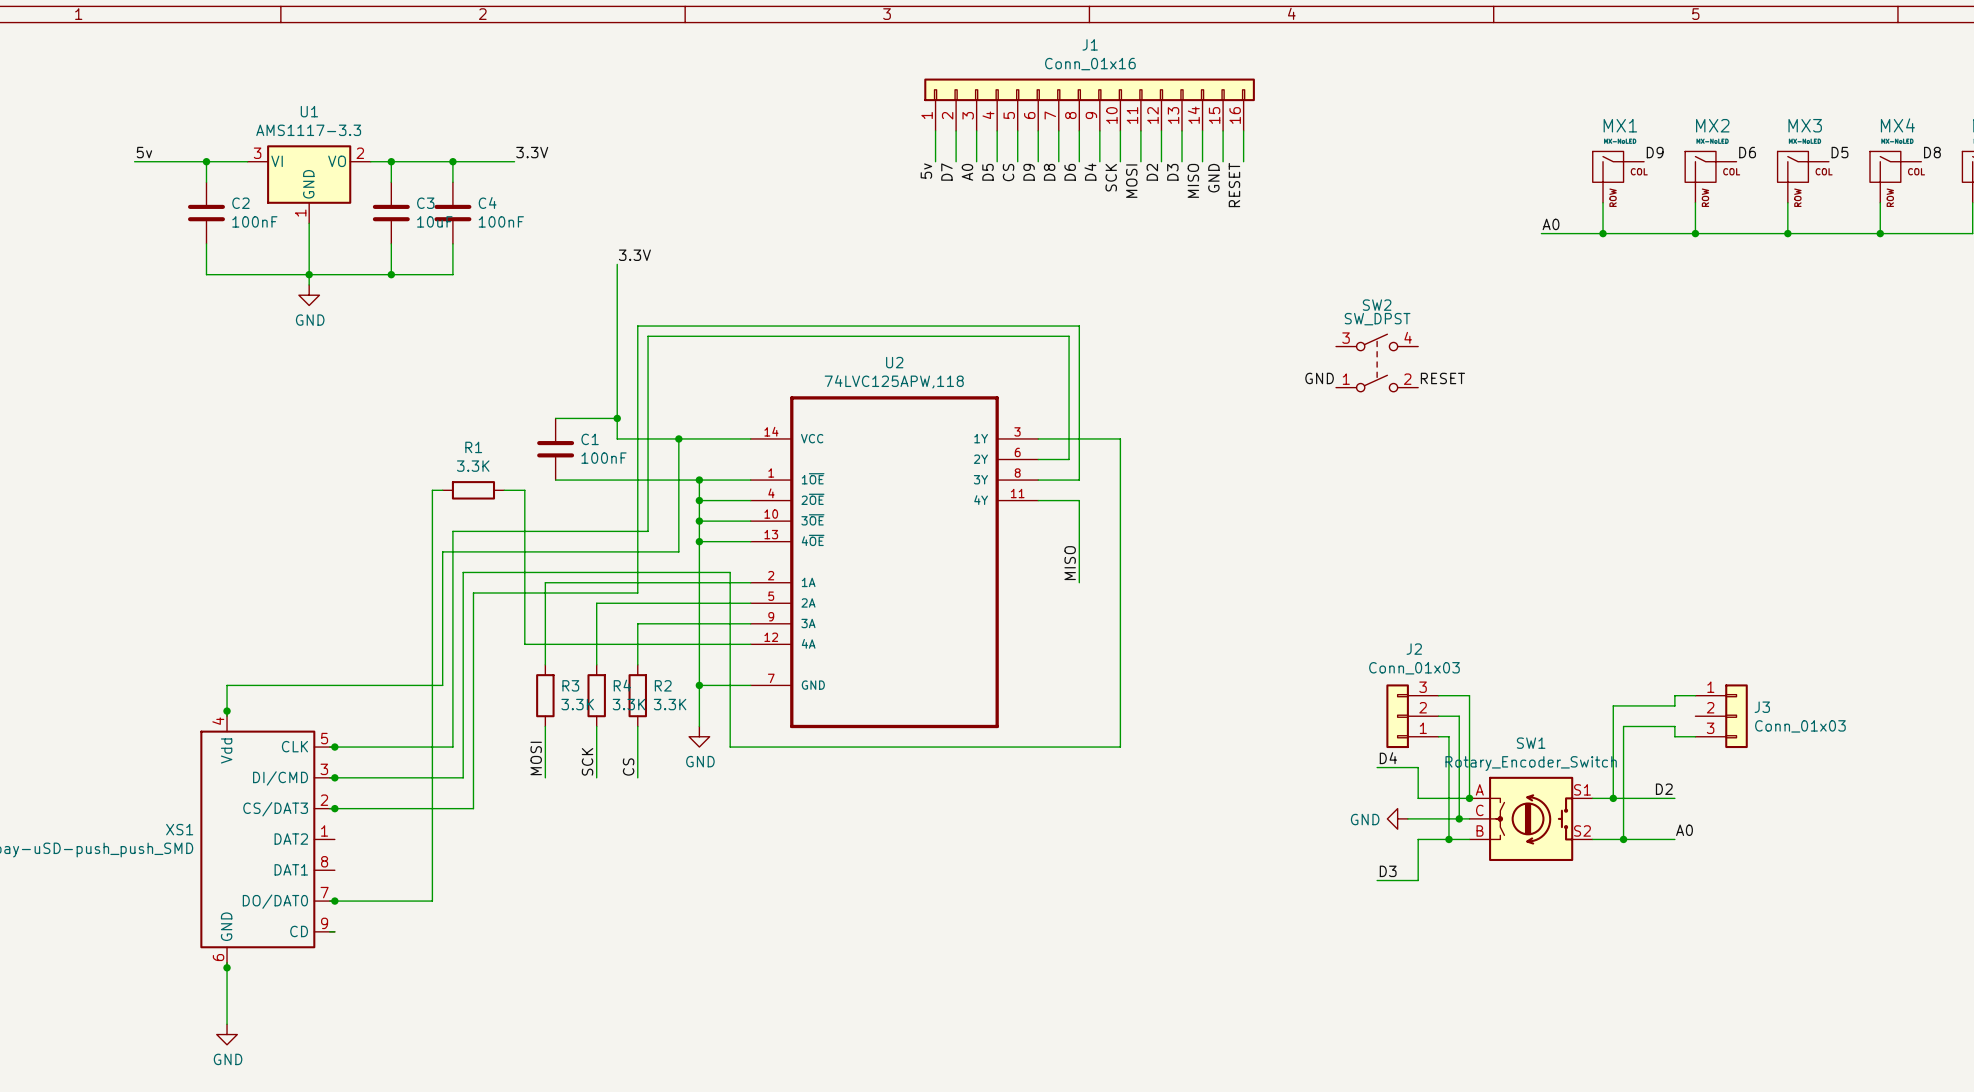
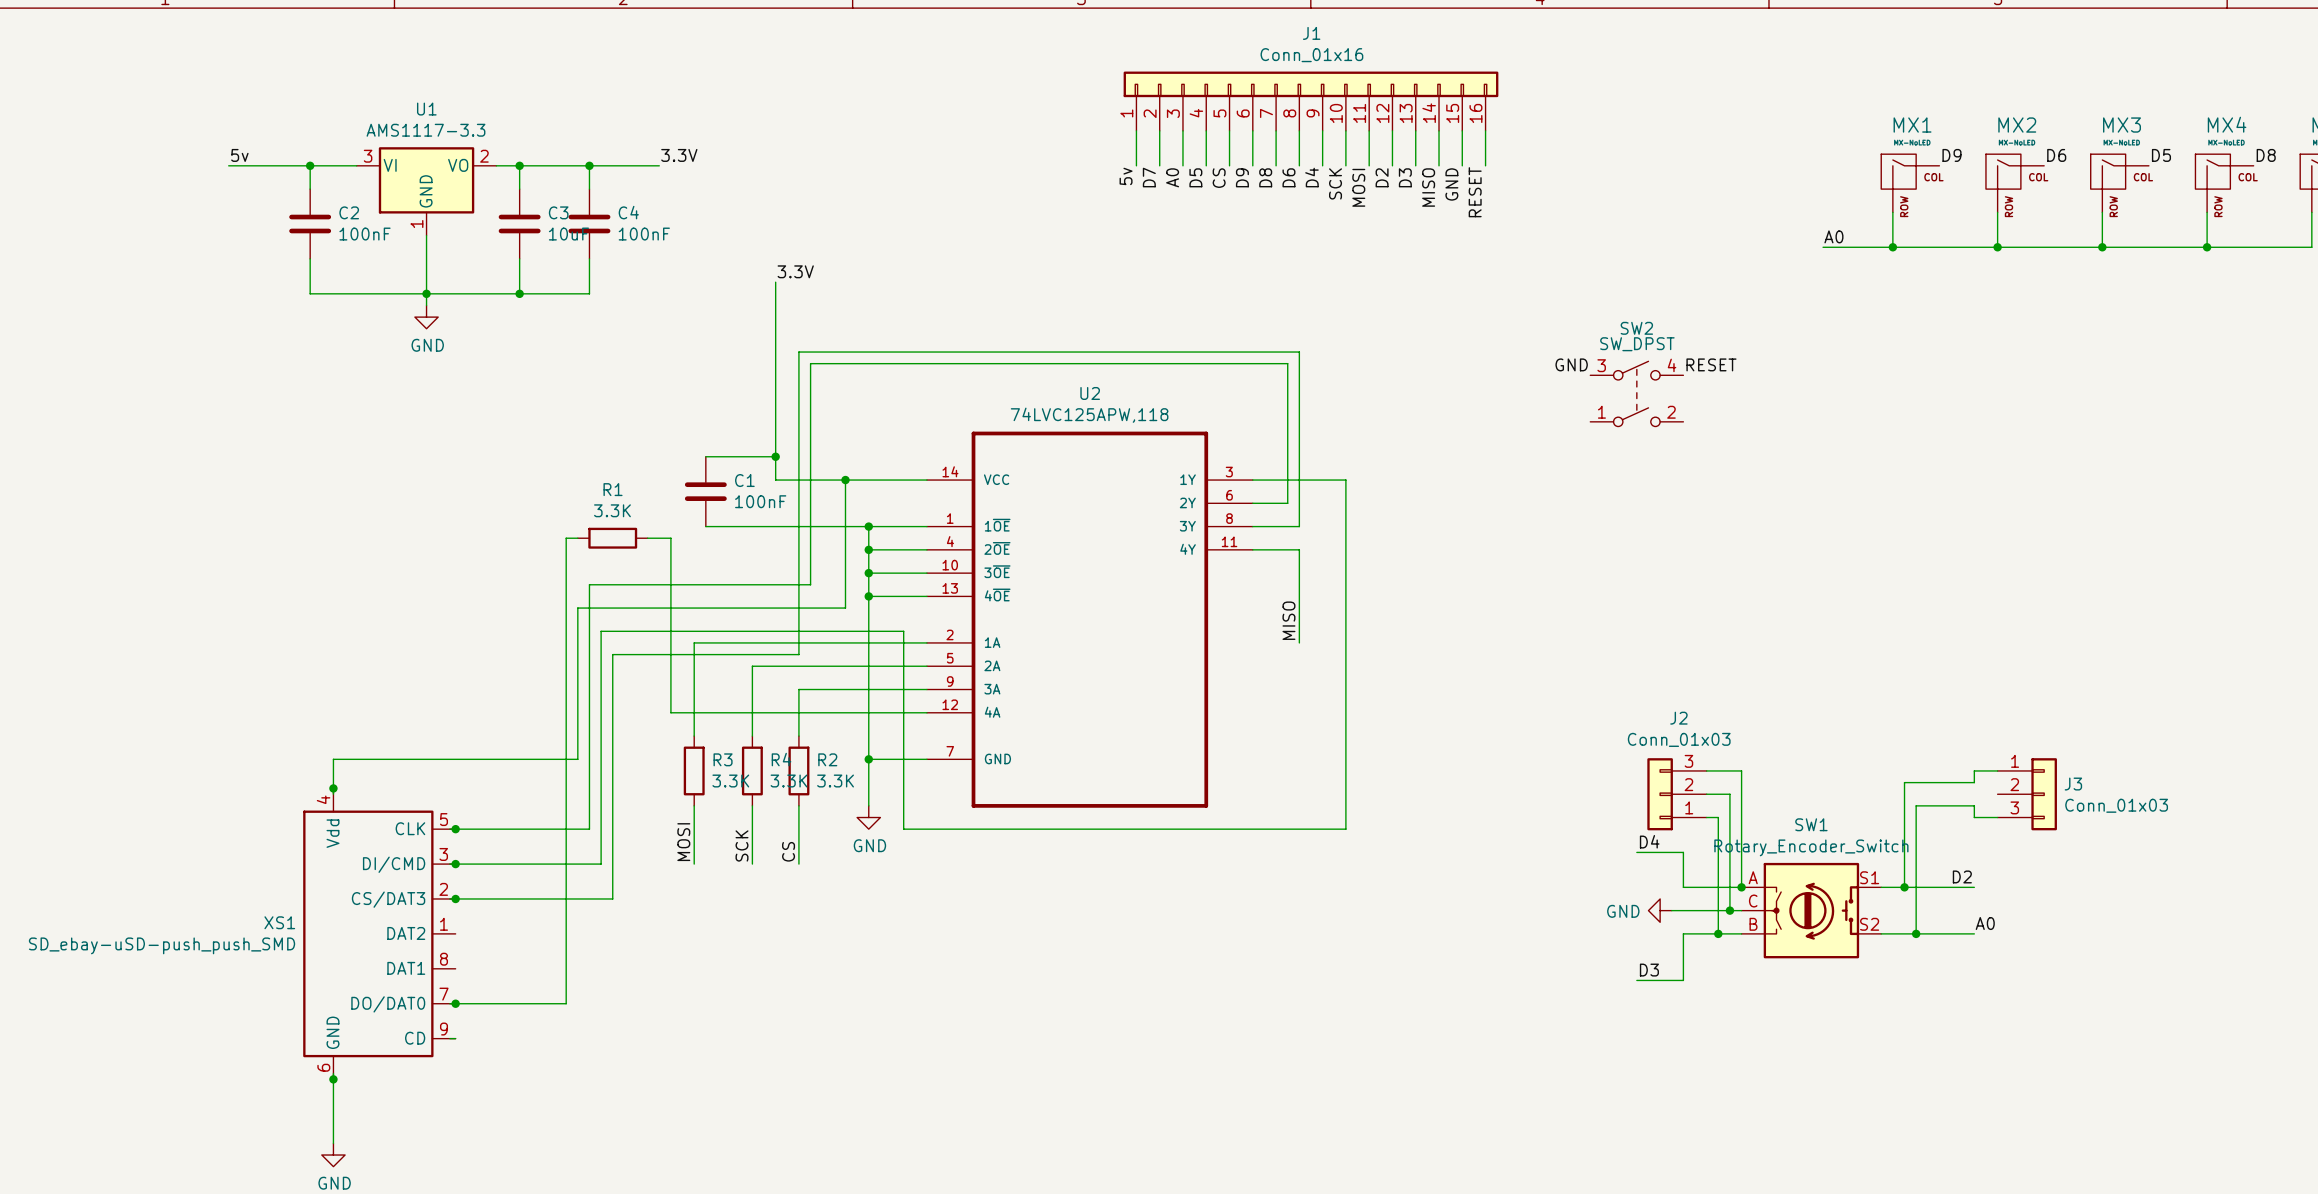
label position: GND (1319, 378) -> GND (1571, 364)
label position: RESET (1442, 378) -> RESET (1711, 364)

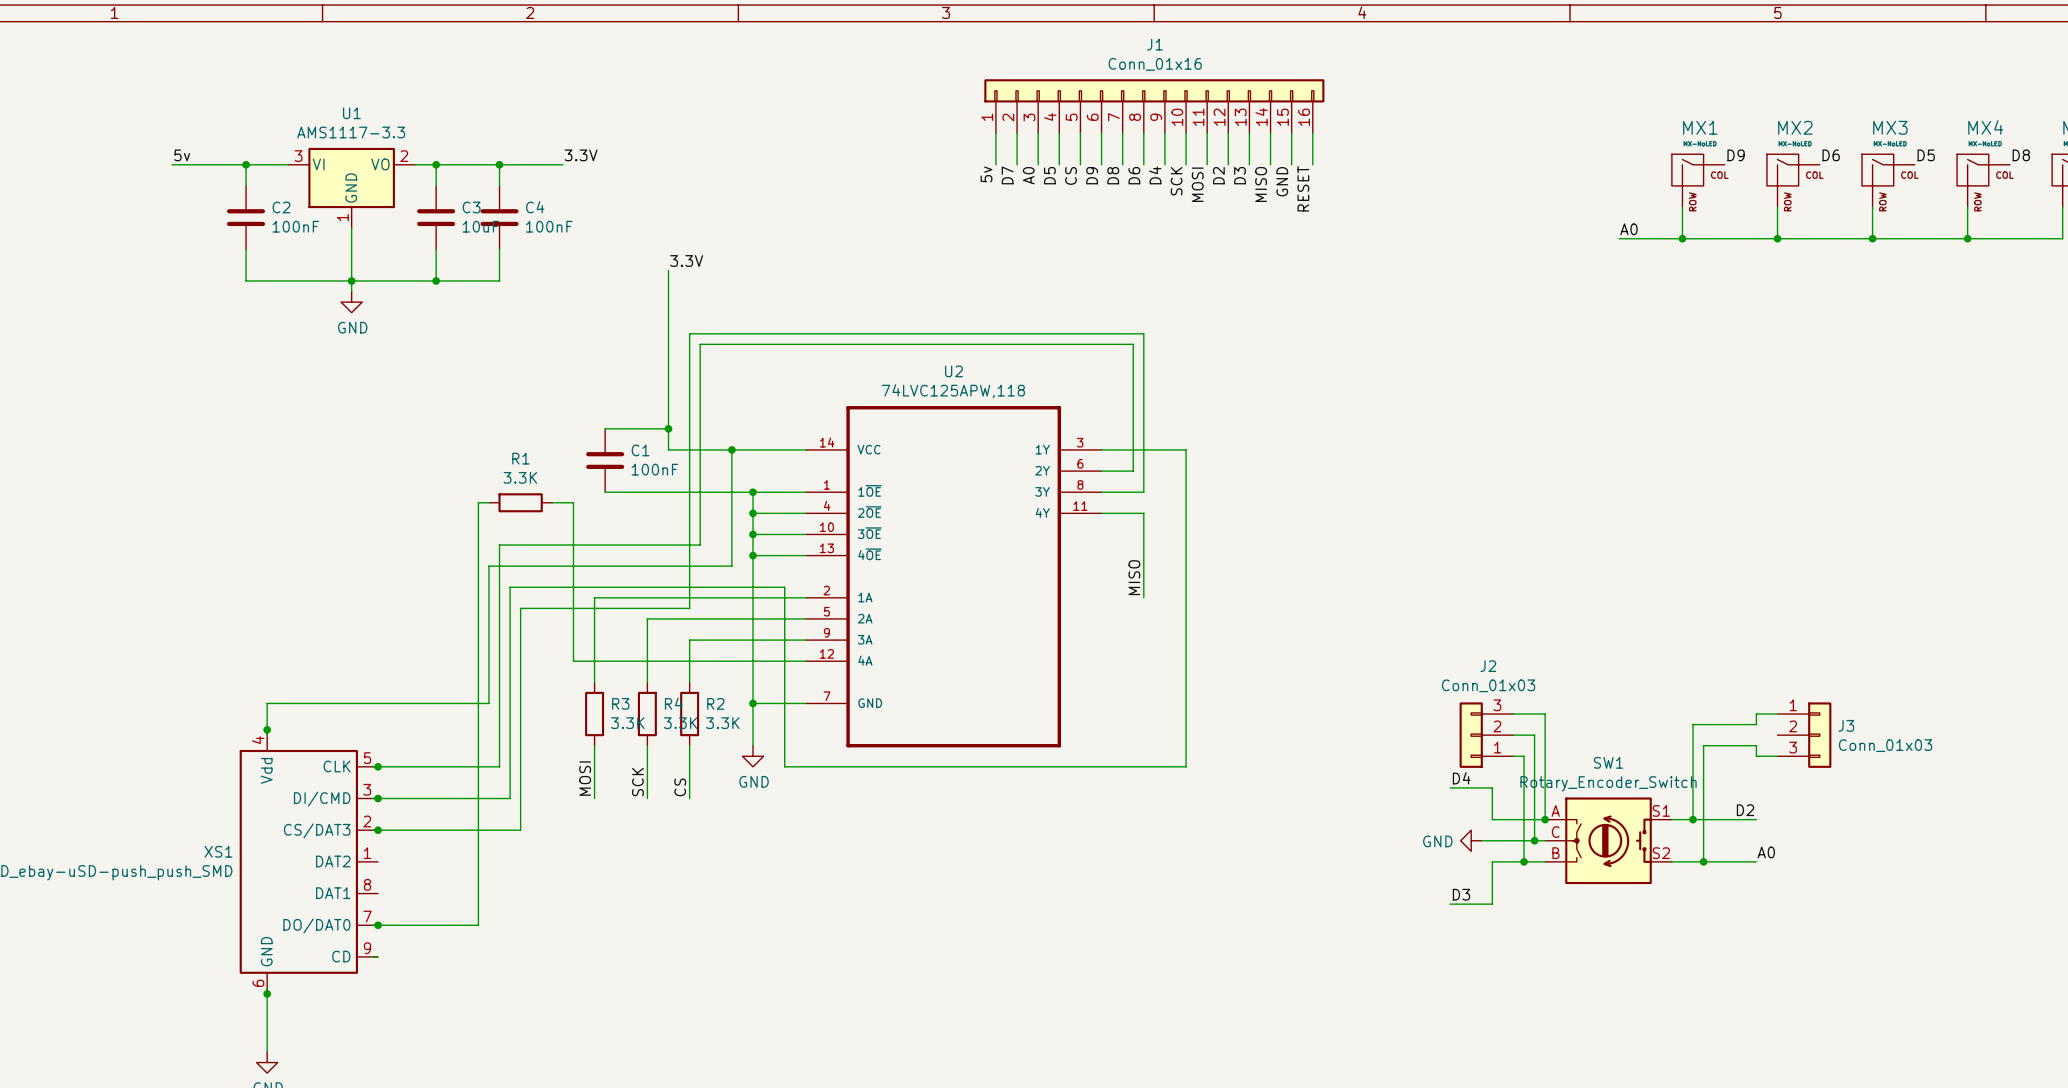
label: GND (1571, 364) -> none
label: RESET (1711, 364) -> none
SW2: SW_DPST (1636, 393) -> none

